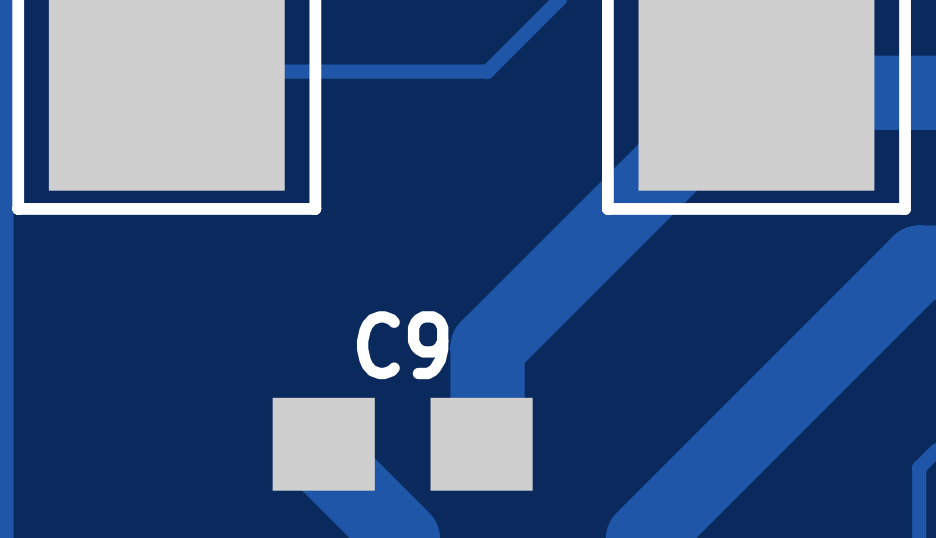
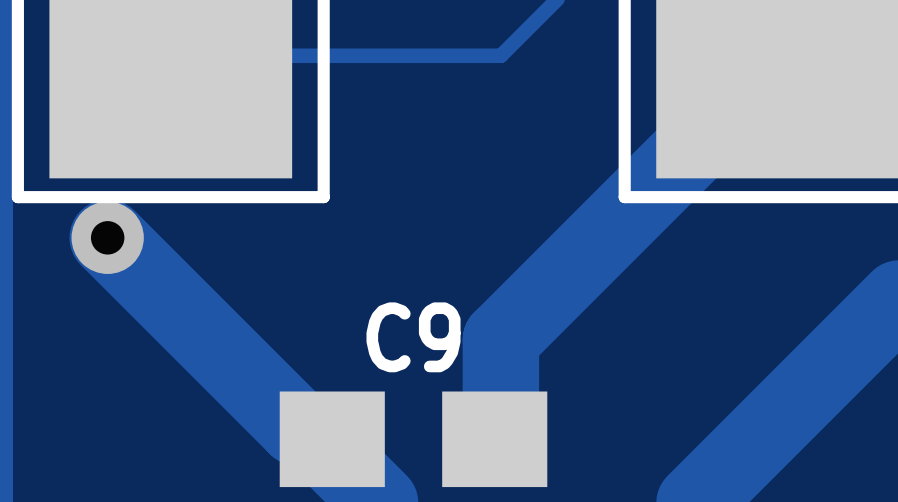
track: none -> (107, 237) (297, 427) (332, 439)
via: none -> (107, 237)

